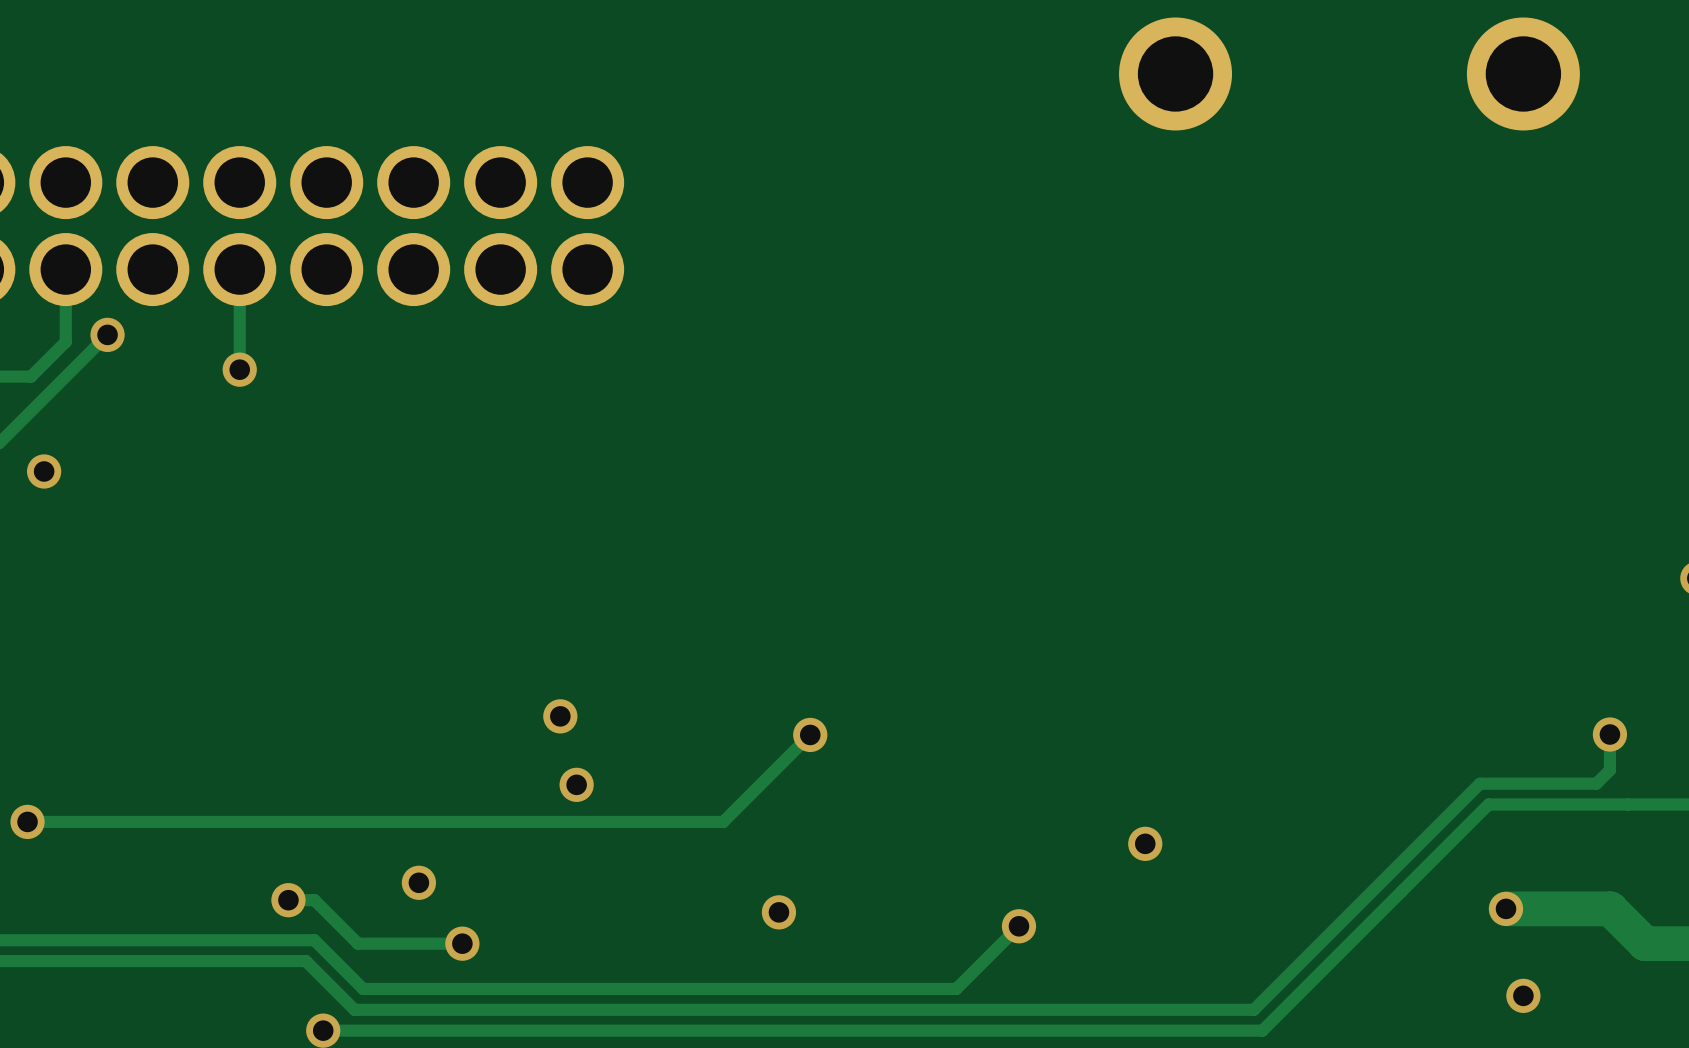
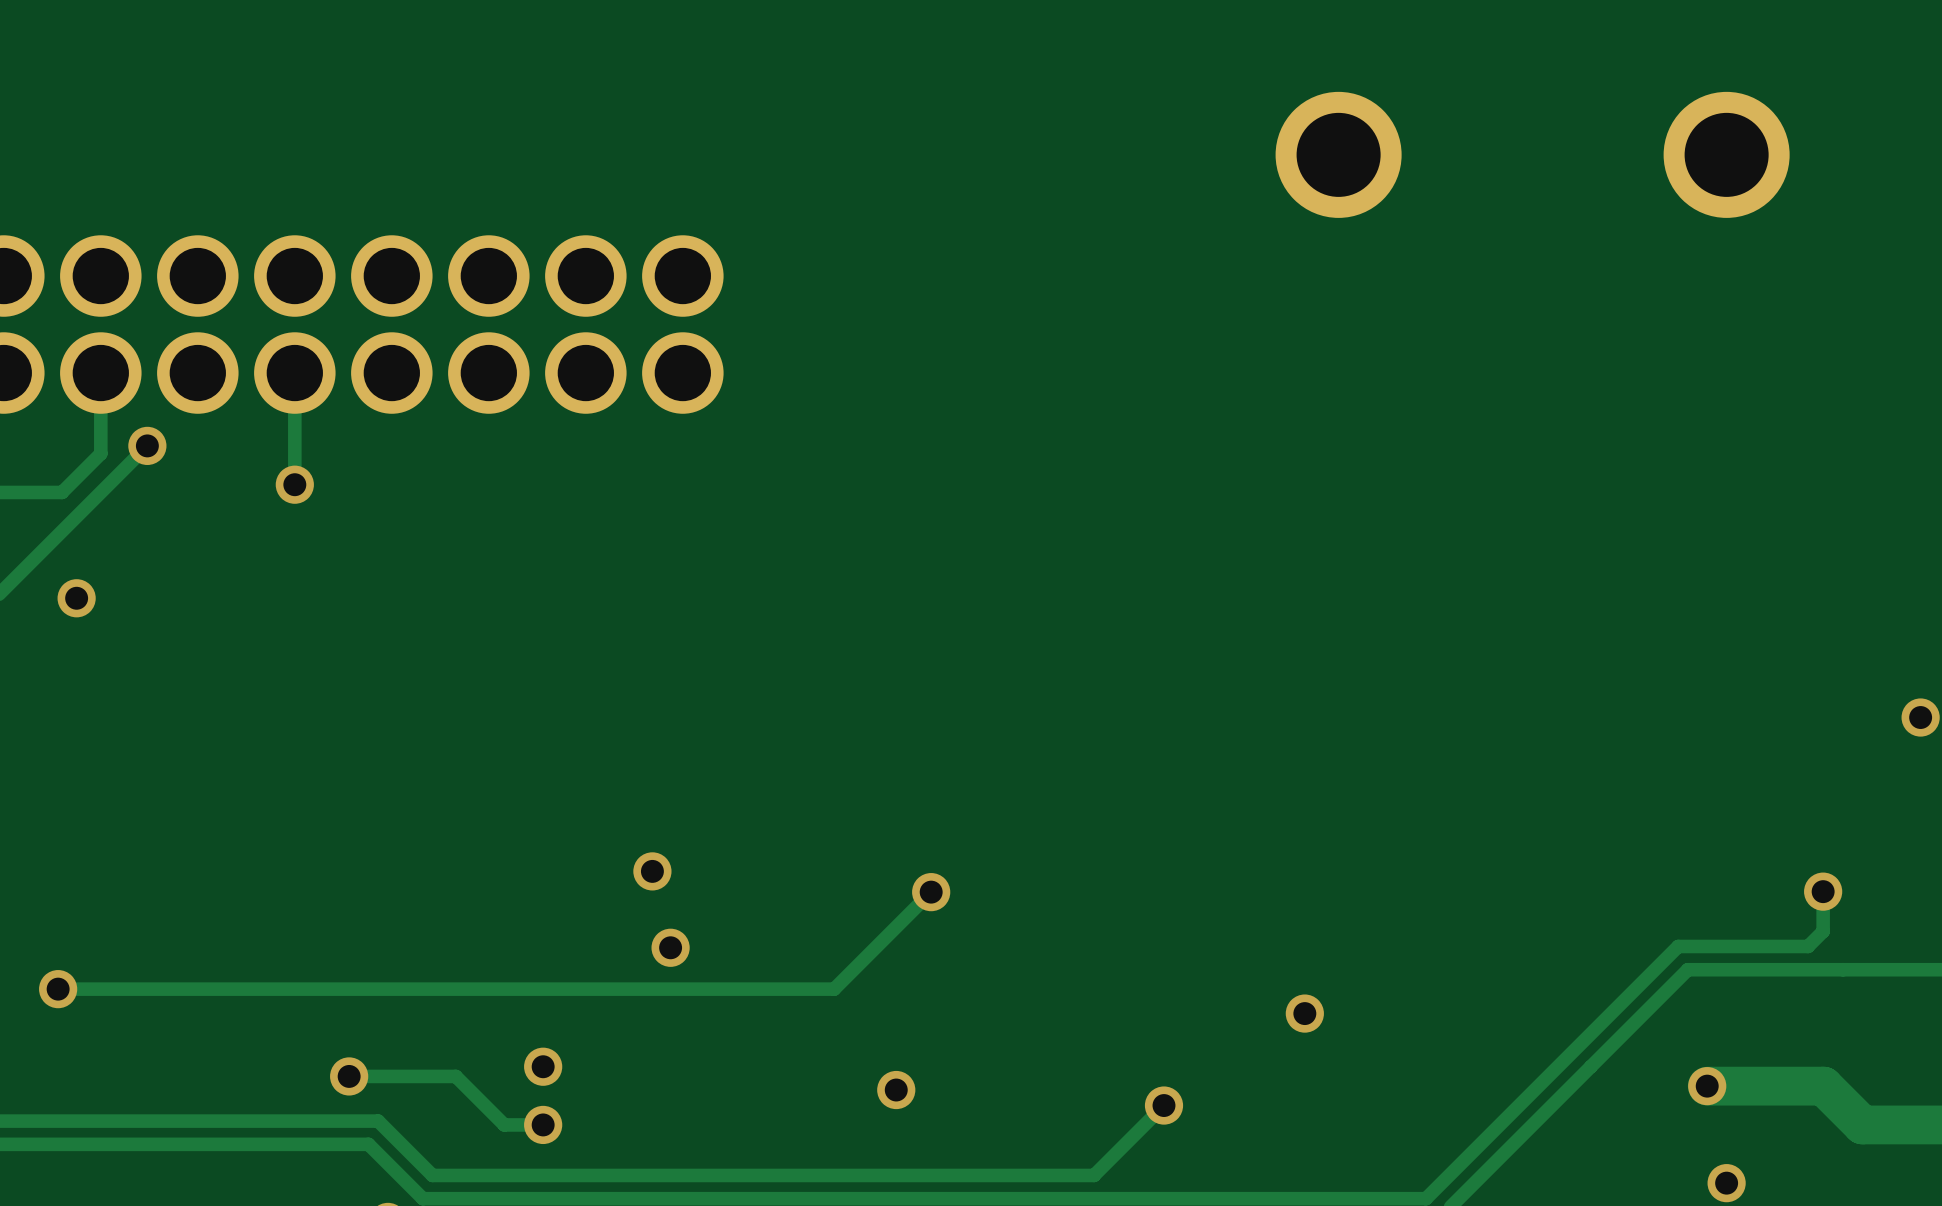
via position: (418, 882) -> (543, 1066)
track: (314, 900) (358, 943) (427, 943) -> (378, 1076) (455, 1076) (504, 1124)

